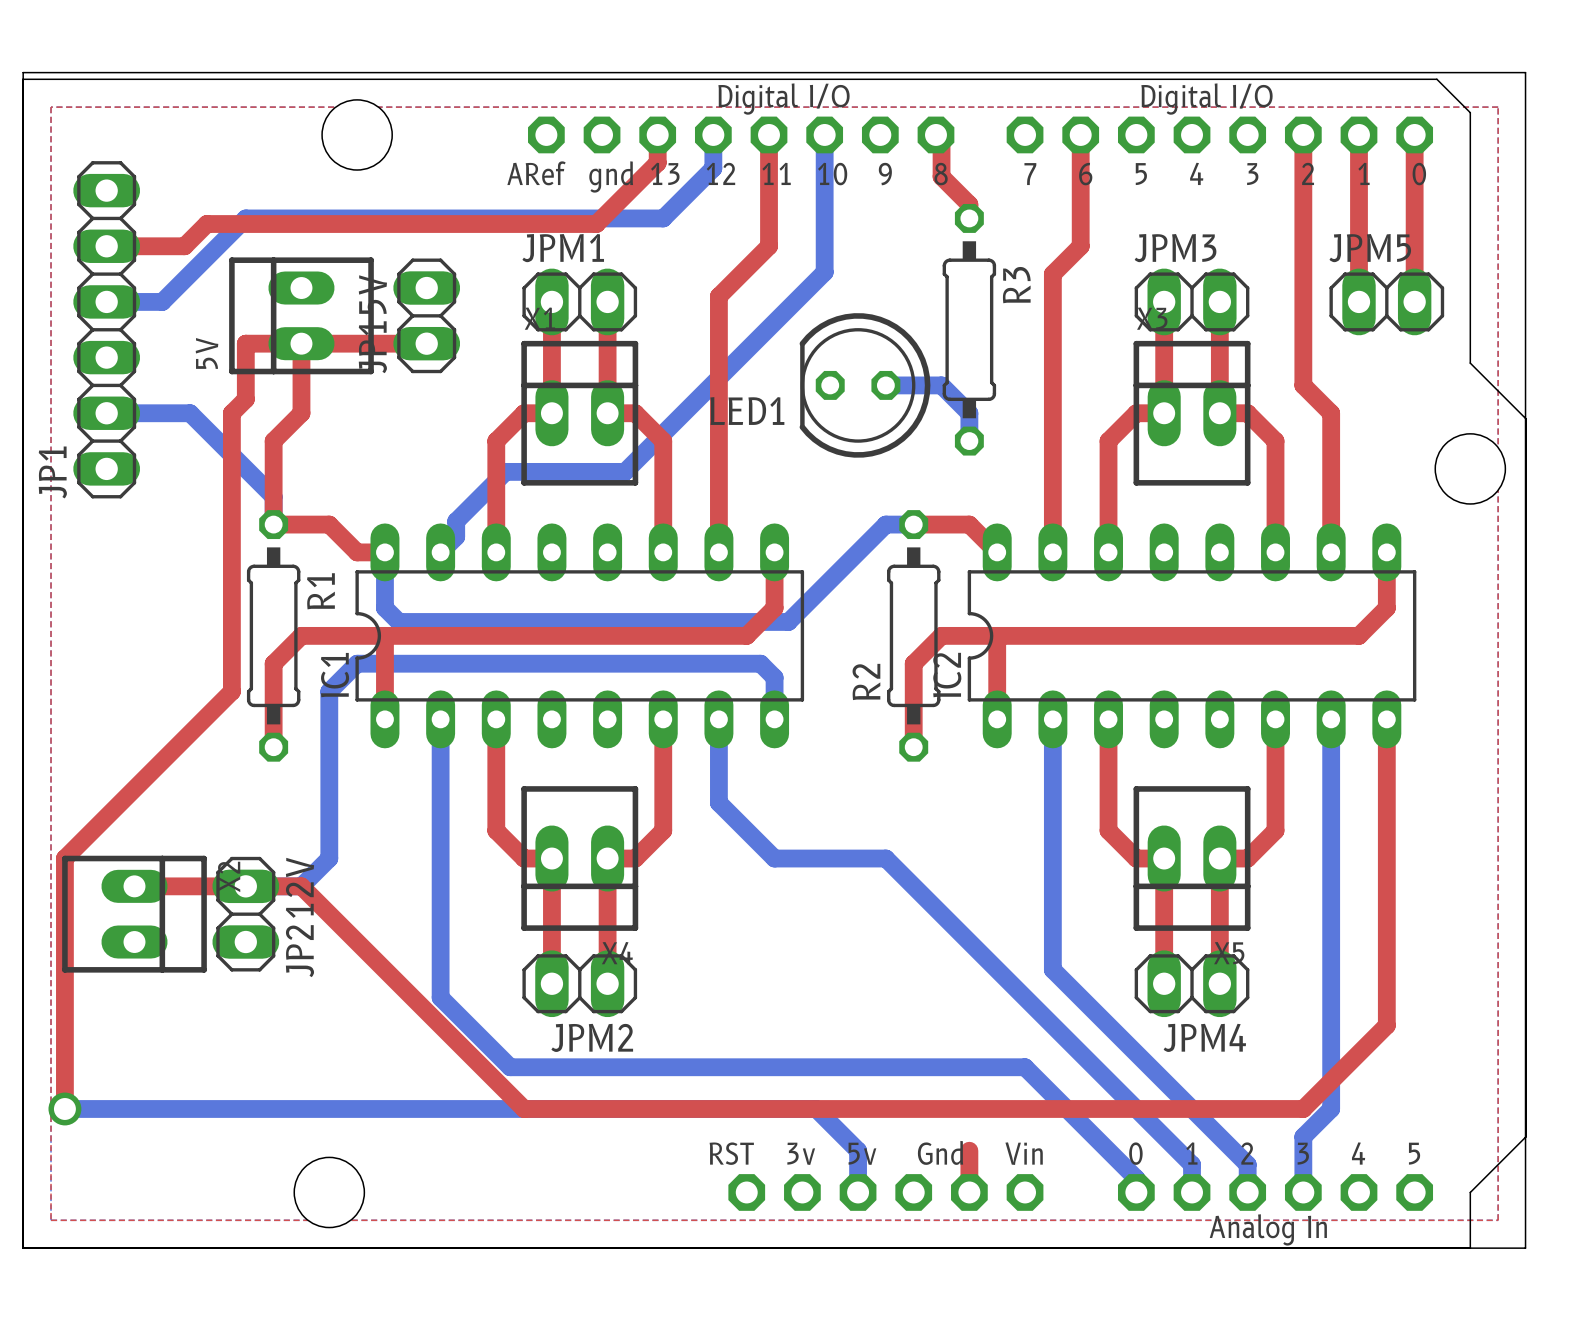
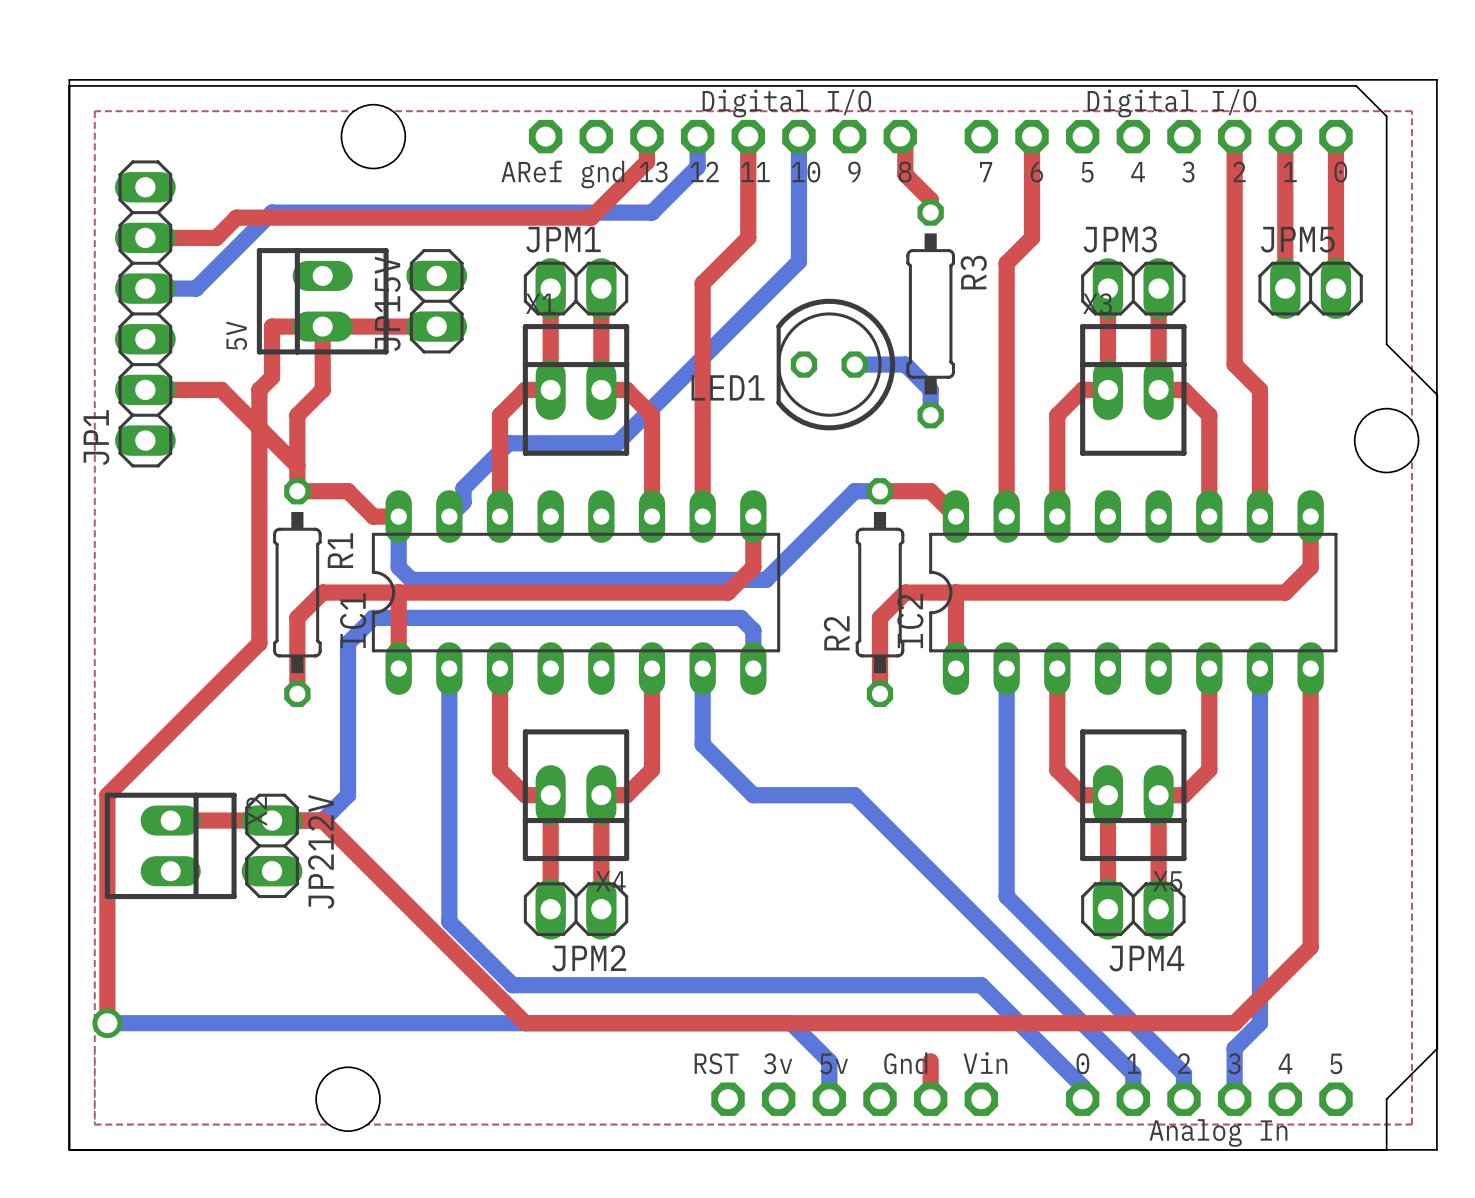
top track: none -> (145, 389) (221, 389) (297, 465)
bottom track: (106, 413) (190, 413) (273, 496) (273, 524) -> none

